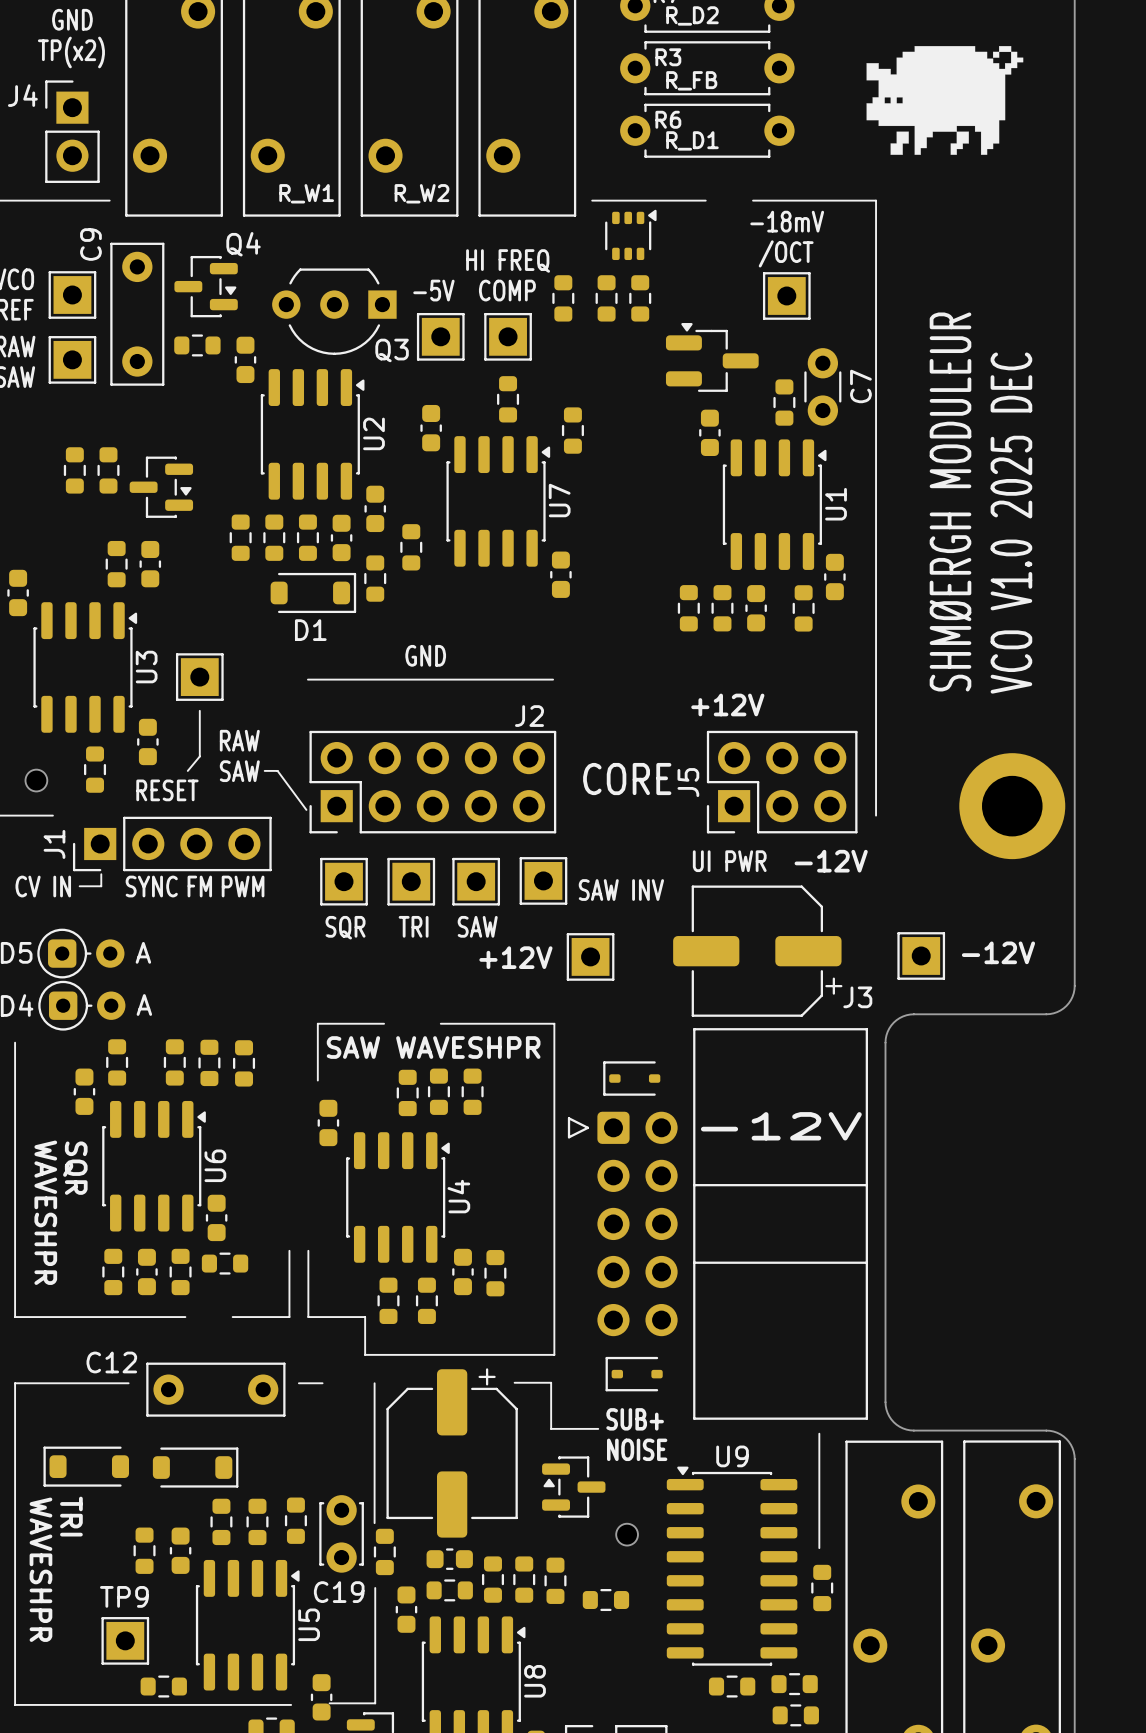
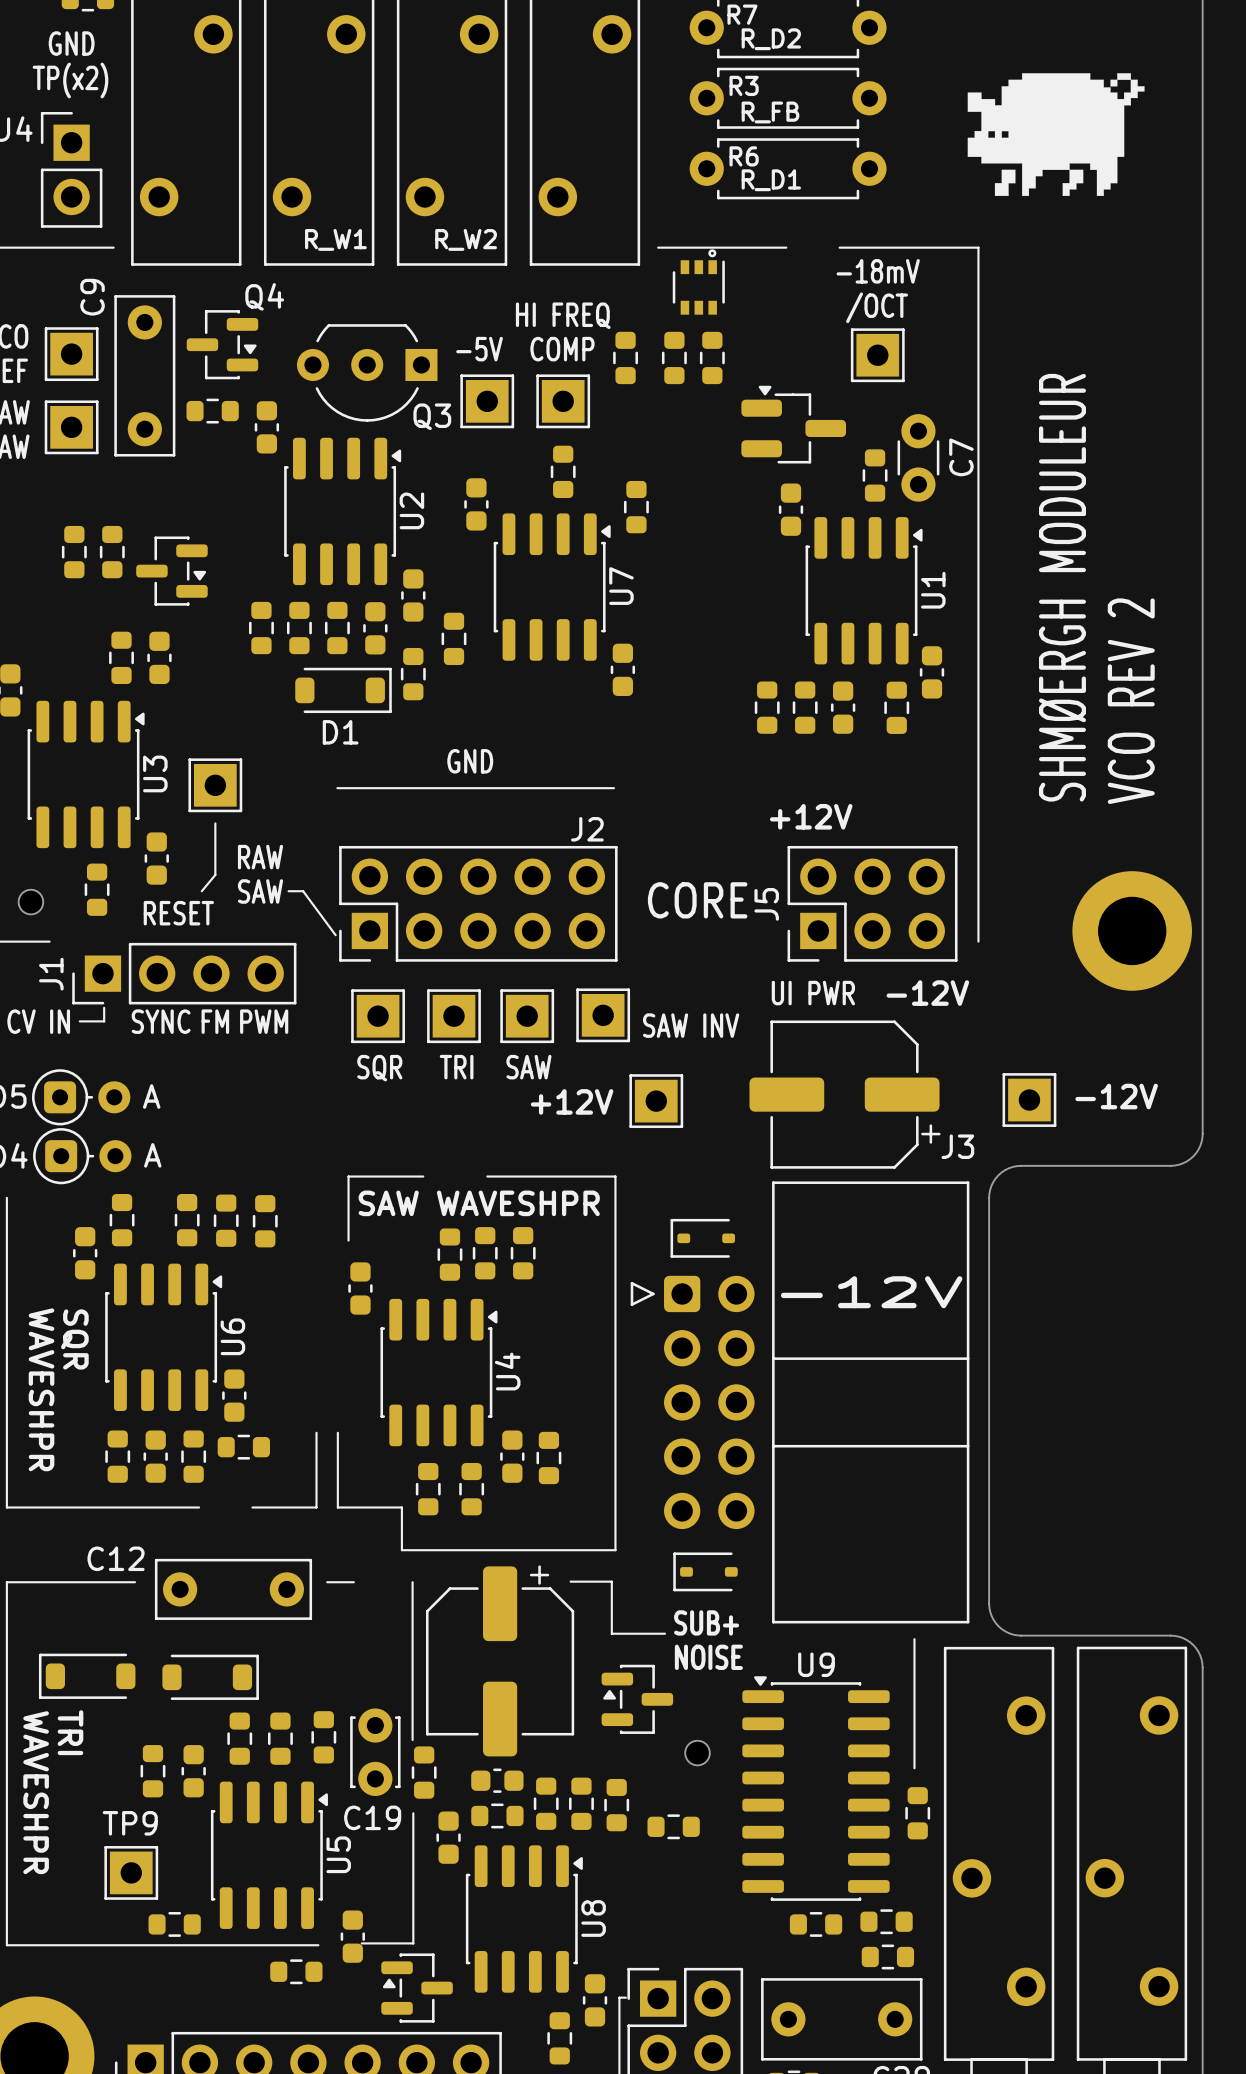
part footprint: [605, 209, 657, 261] -> [672, 249, 725, 315]
text: VCO V1.0 2025 DEC (1011, 523) -> VCO REV 2 (1131, 701)

